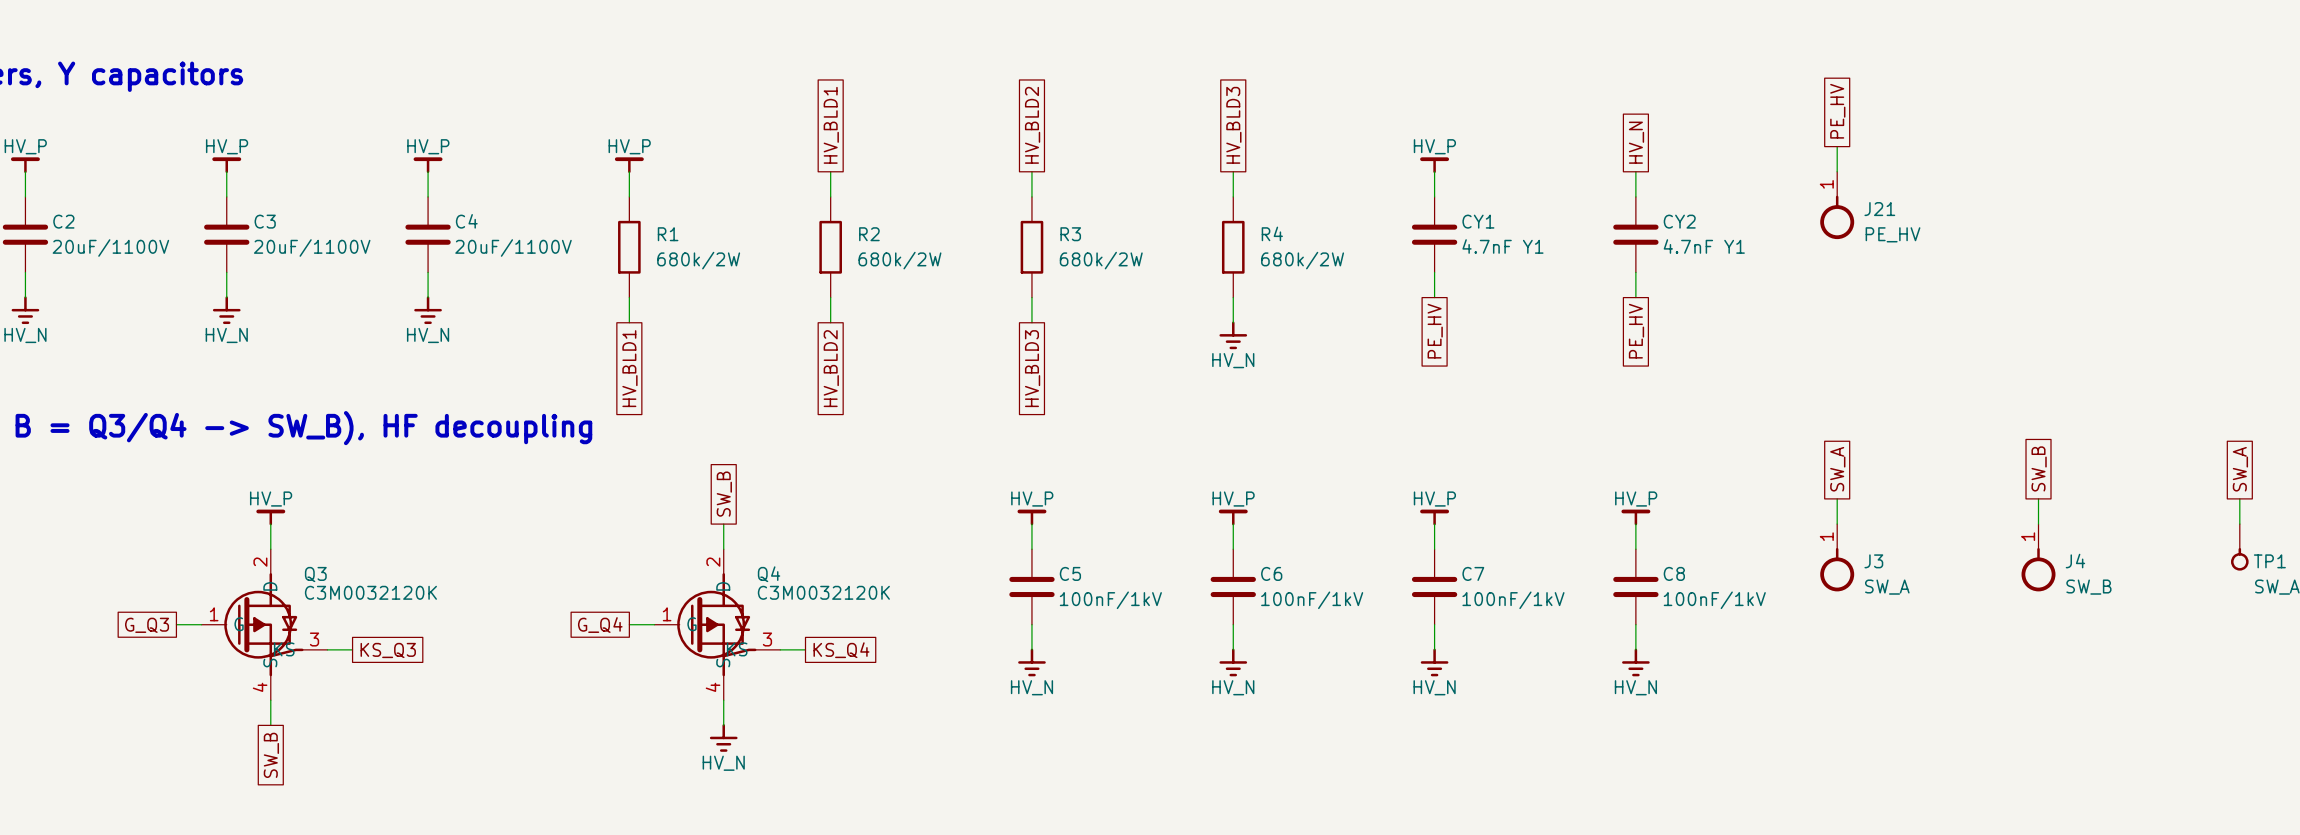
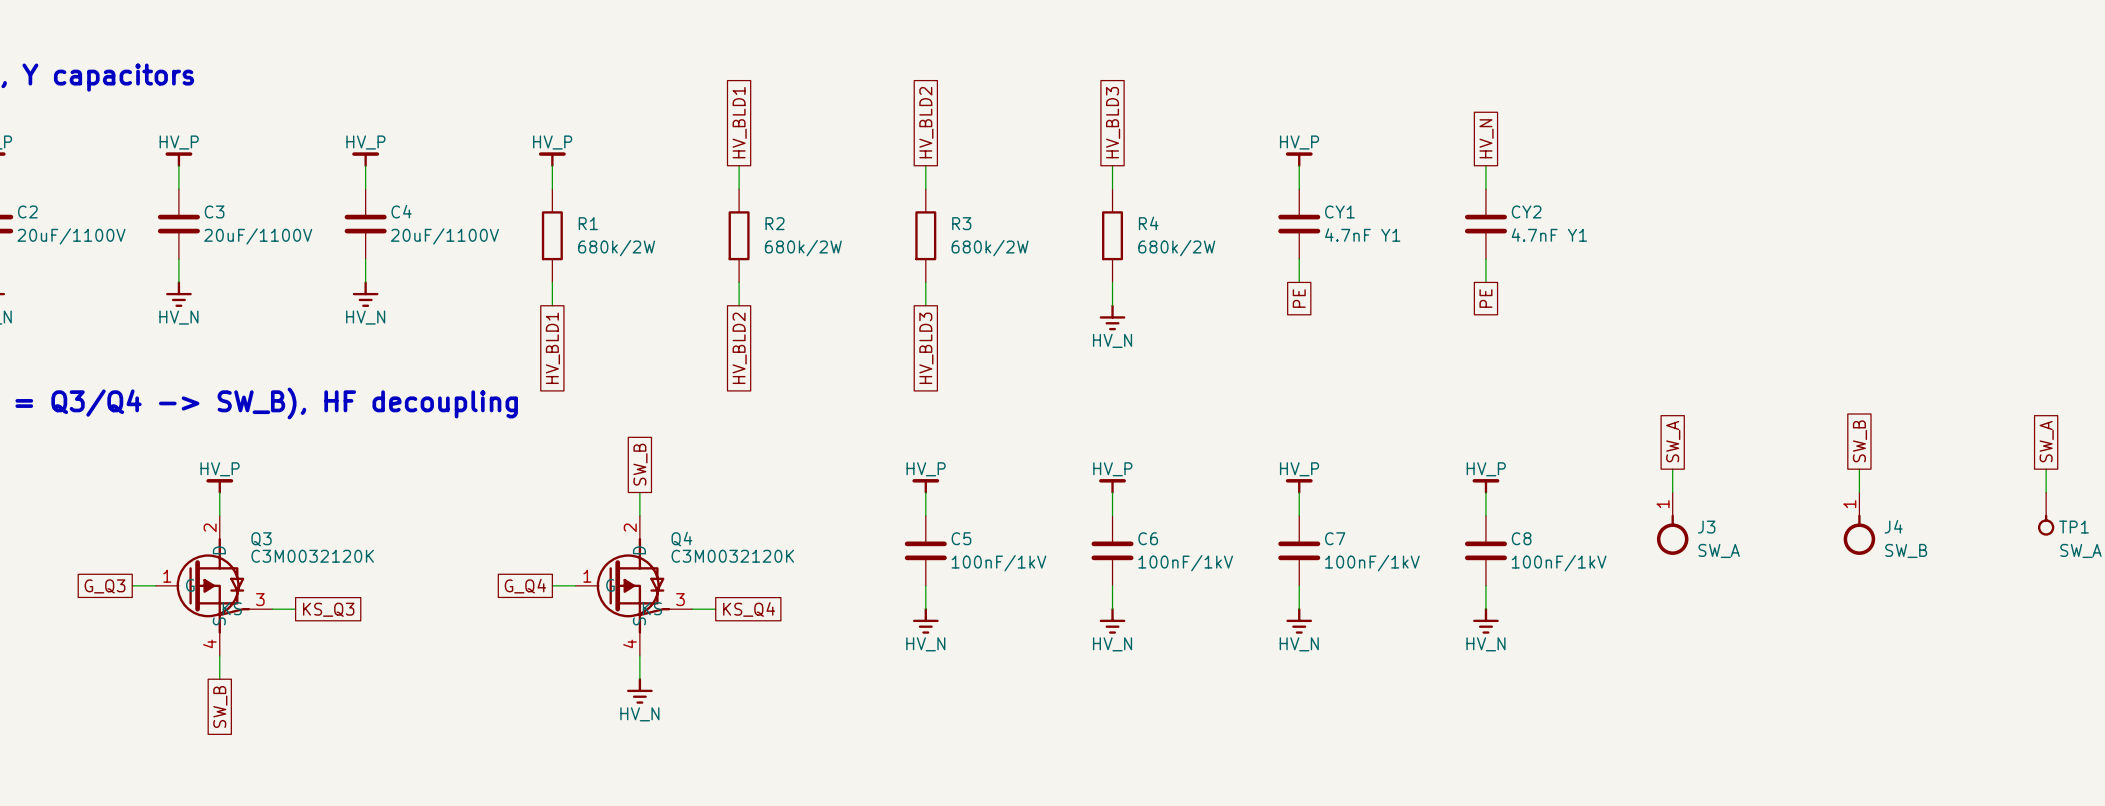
global label: PE_HV (1837, 111) -> none
wire: (1837, 146) (1837, 171) -> none
J21: PE_HV (1837, 205) -> none
global label: PE_HV (1435, 331) -> PE (1299, 298)
global label: PE_HV (1636, 331) -> PE (1485, 298)

